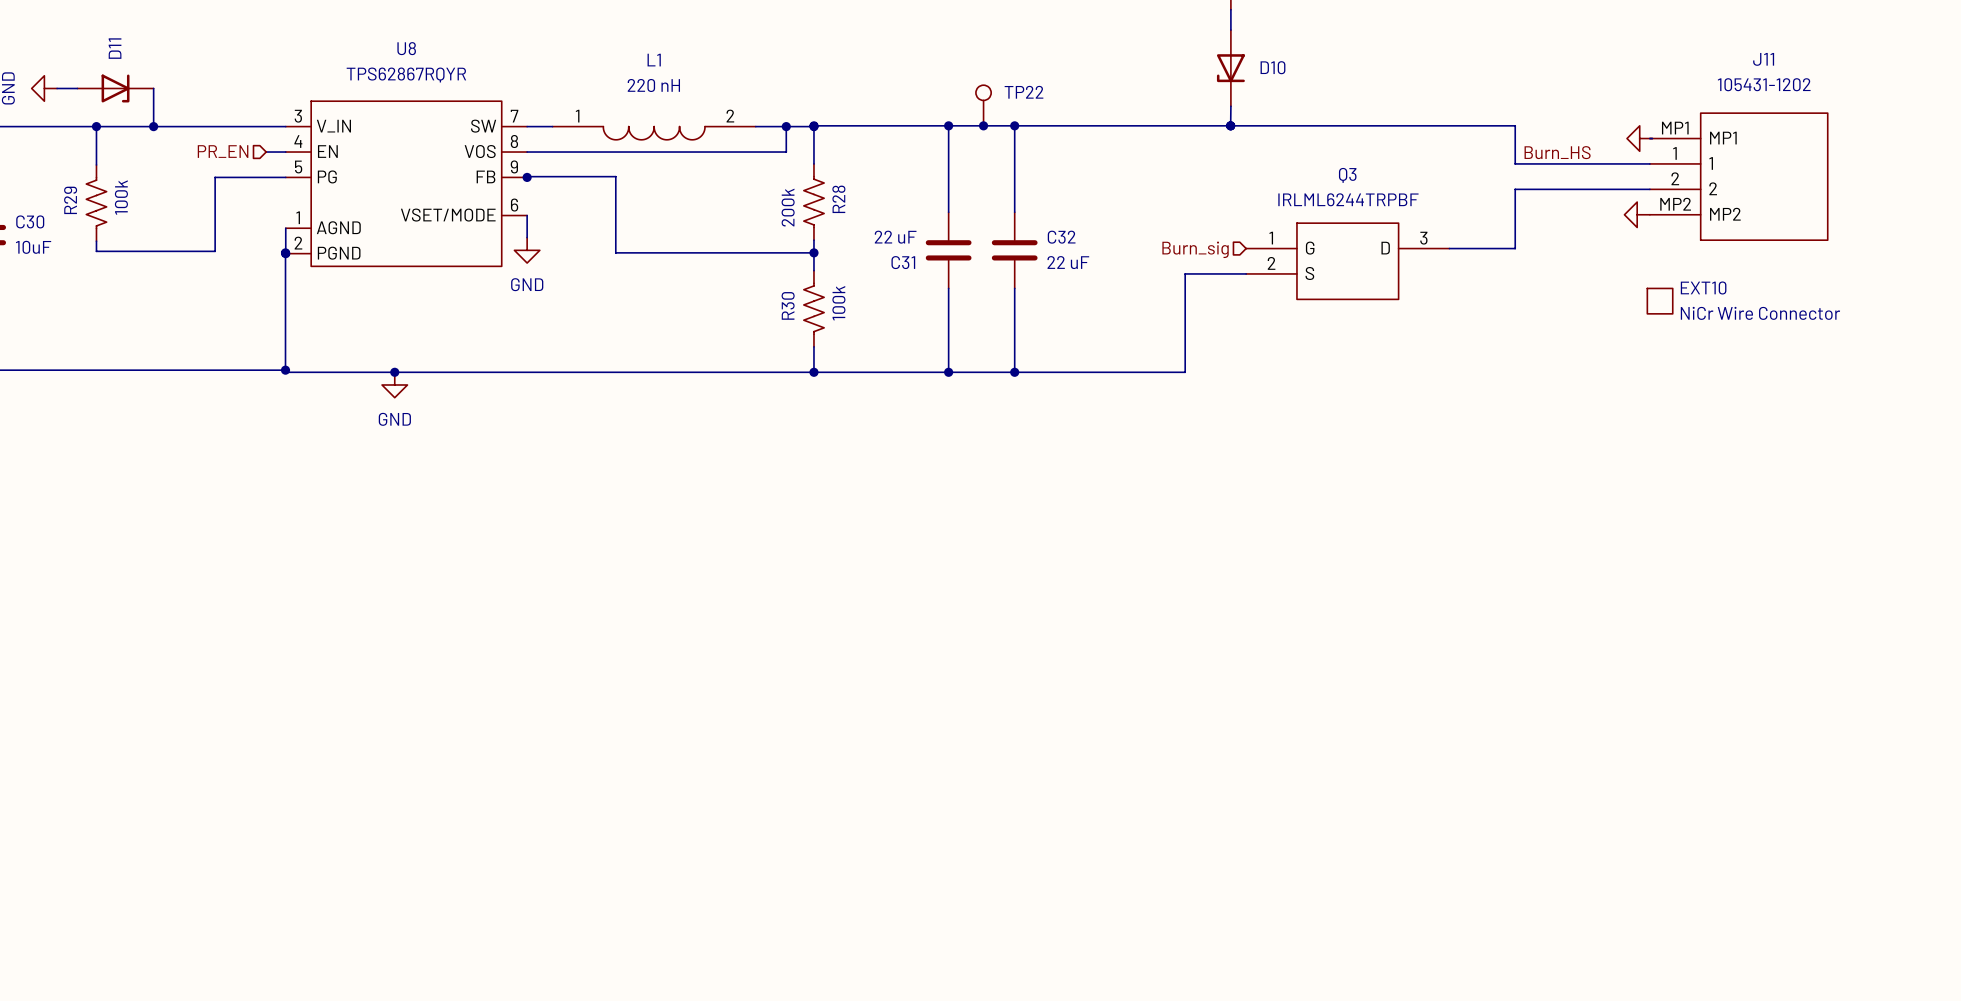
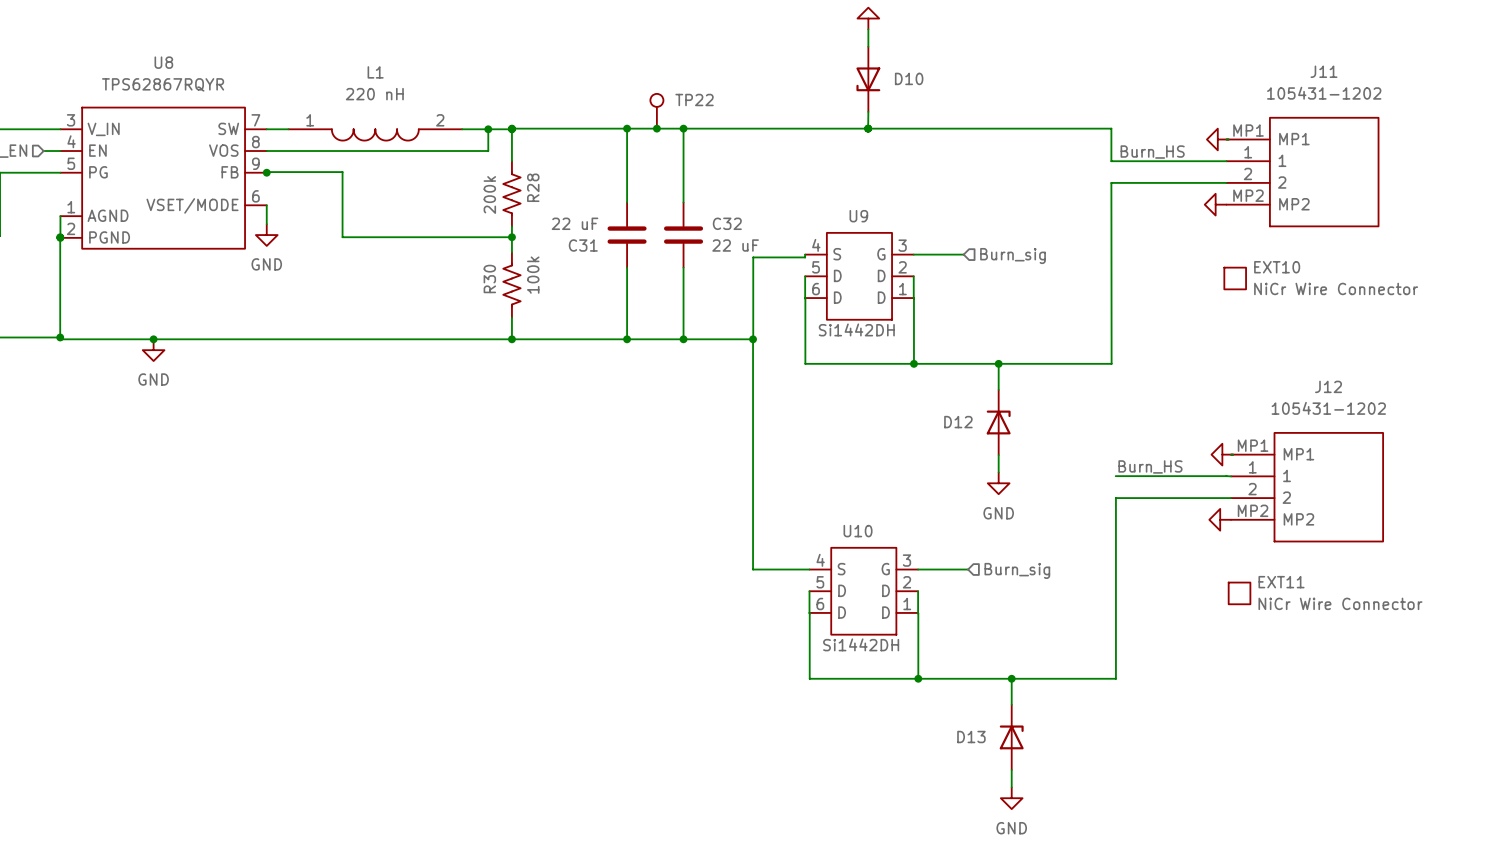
wire: (1515, 189) (1515, 248) (1449, 248) -> (1111, 182) (1111, 363) (805, 363) (805, 276)
hierarchical label rotation: 0° (1195, 249) -> 180° (1013, 256)
hierarchical label position: Burn_sig (1195, 249) -> Burn_sig (1013, 256)
Q3: IRLML6244TRPBF (1347, 261) -> none
wire: none -> (805, 254) (805, 257) (753, 257) (753, 569) (809, 569)
wire: (1246, 273) (1185, 273) (1185, 372) (1096, 372) -> none
wire: none -> (913, 254) (963, 254)
U9: none -> Si1442DH (859, 276)
wire: none -> (913, 276) (913, 363)
junction: none -> (753, 339)
junction: none -> (913, 363)
wire: none -> (998, 363) (998, 389)
junction: none -> (998, 363)
D12: none -> (998, 422)
wire: none -> (998, 455) (998, 472)
power symbol: none -> (1222, 454)
wire: none -> (1231, 454) (1233, 454)
label: none -> Burn_HS (1150, 466)
wire: none -> (1115, 476) (1231, 476)
power symbol: none -> GND (998, 483)
J12: none -> 105431-1202 (1307, 487)
wire: none -> (1231, 498) (1115, 498) (1115, 678) (809, 678) (809, 591)
power symbol: none -> (1220, 519)
wire: none -> (918, 569) (968, 569)
hierarchical label: none -> Burn_sig (1017, 570)
U10: none -> Si1442DH (863, 591)
wire: none -> (918, 591) (918, 678)
EXT11: none -> NiCr Wire Connector (1239, 593)
junction: none -> (918, 678)
wire: none -> (1011, 678) (1011, 704)
junction: none -> (1011, 678)
D13: none -> (1011, 737)
wire: none -> (1011, 769) (1011, 787)
power symbol: none -> GND (1011, 798)

